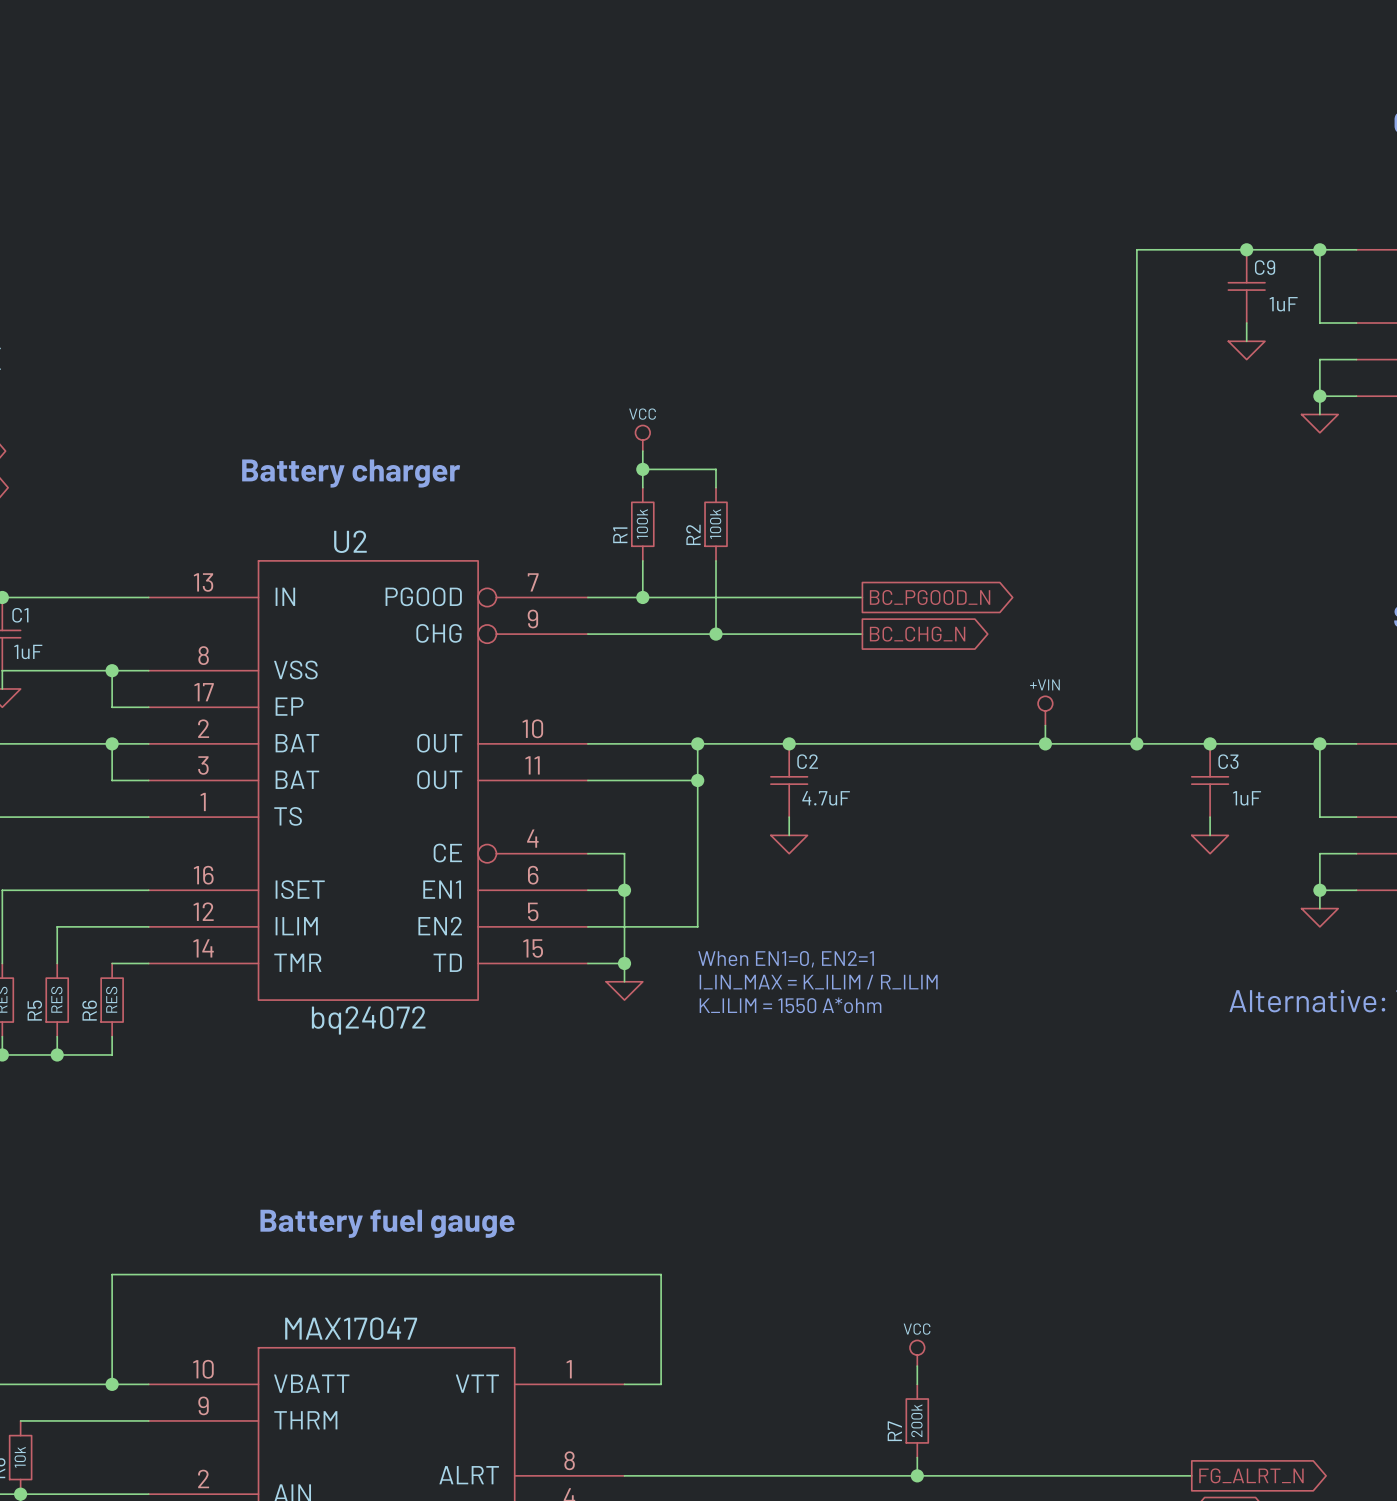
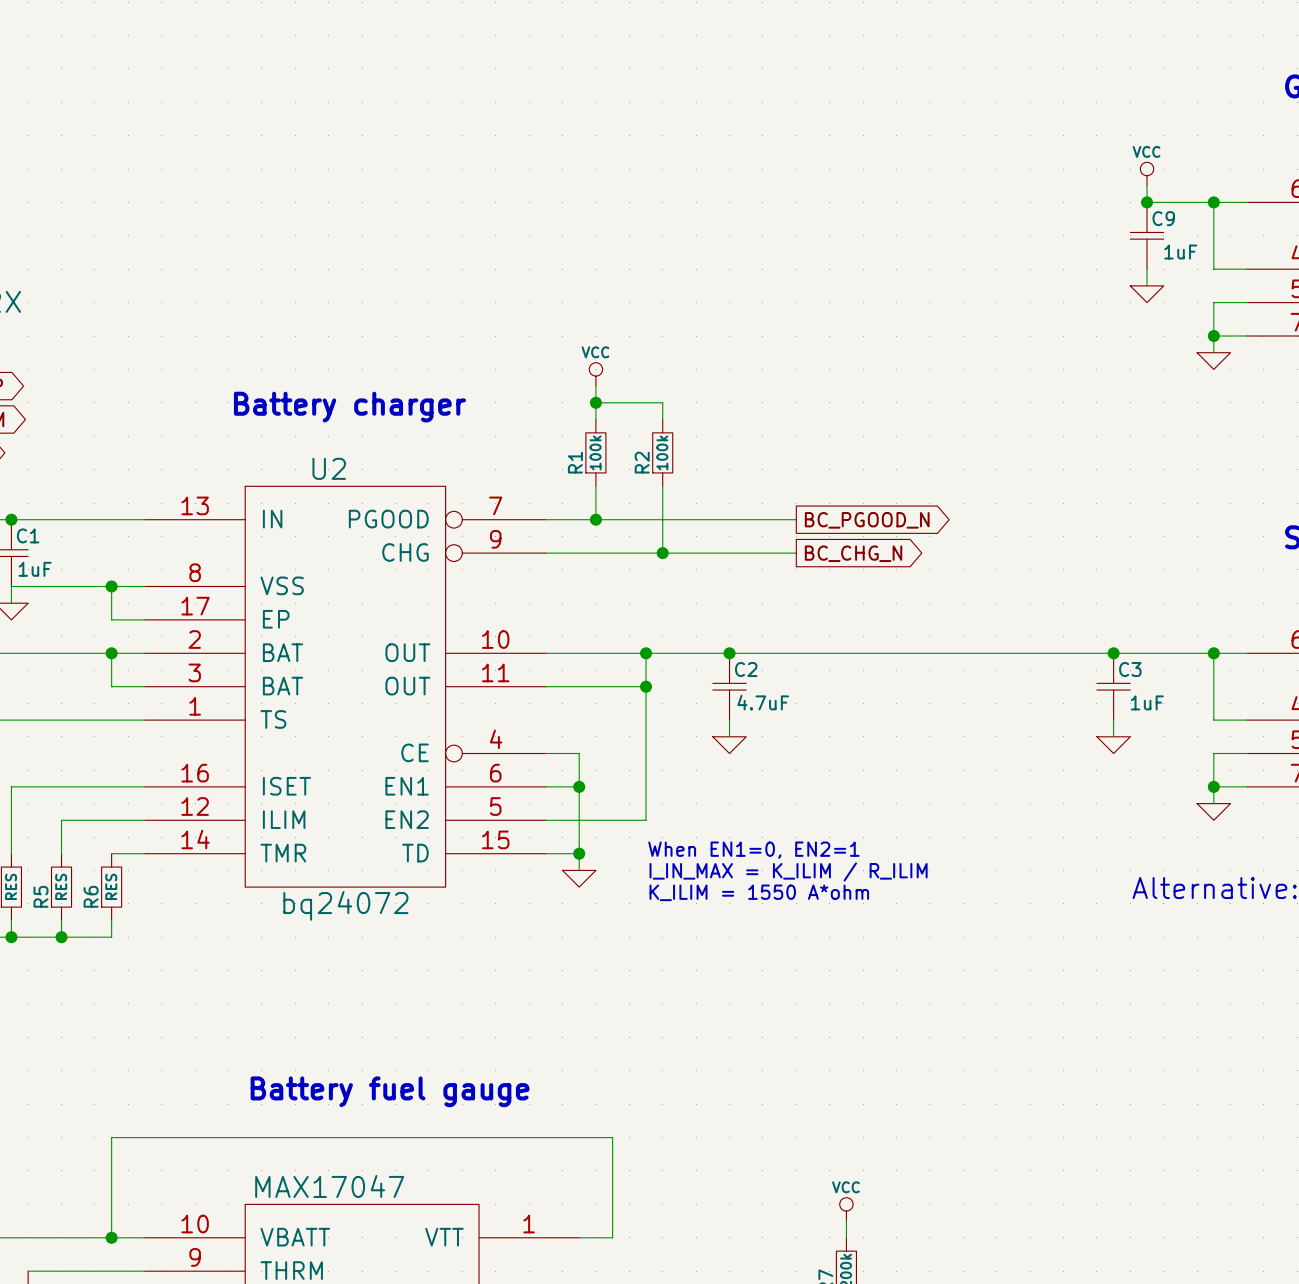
power symbol: none -> VCC (1147, 174)
wire: (1246, 249) (1136, 249) (1136, 743) -> (1147, 202) (1147, 185)
power symbol: +VIN (1045, 710) -> none
wire: (1045, 725) (1045, 743) -> none
junction: (1045, 743) -> none
junction: (1136, 743) -> none

